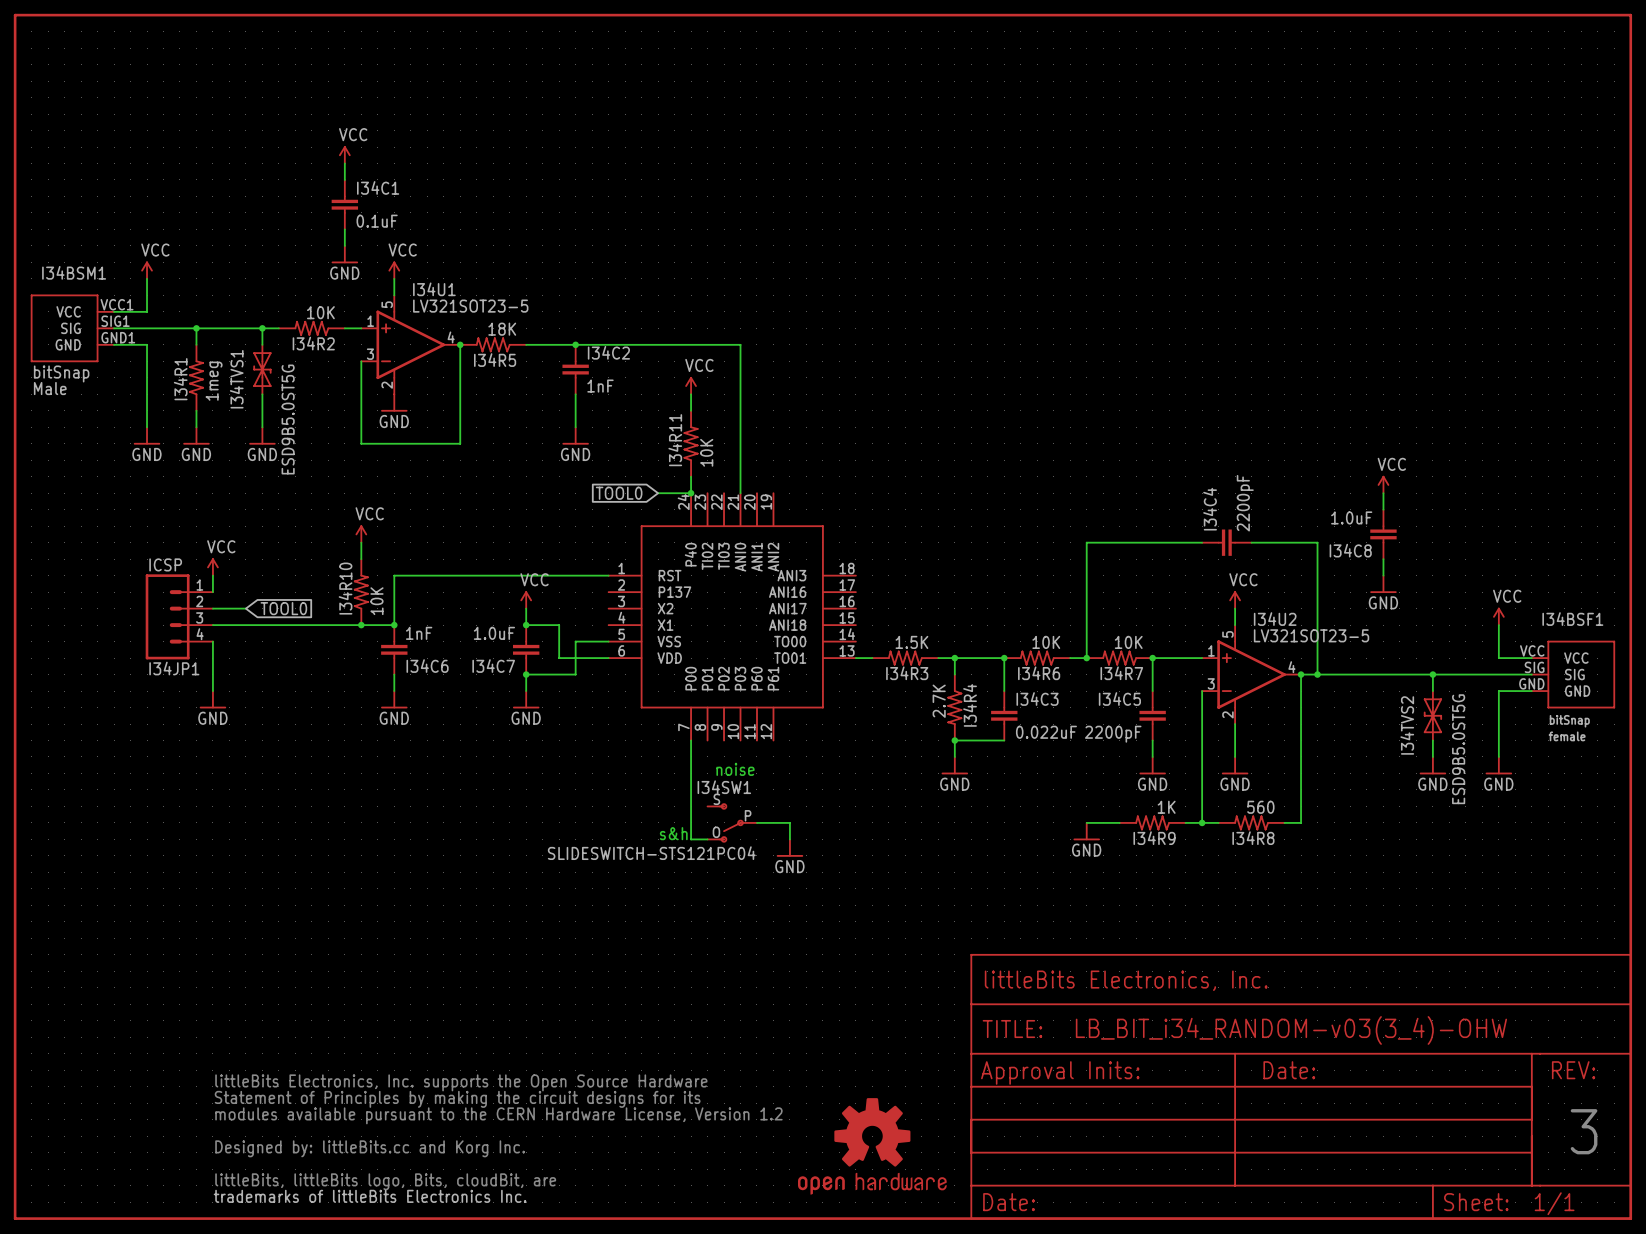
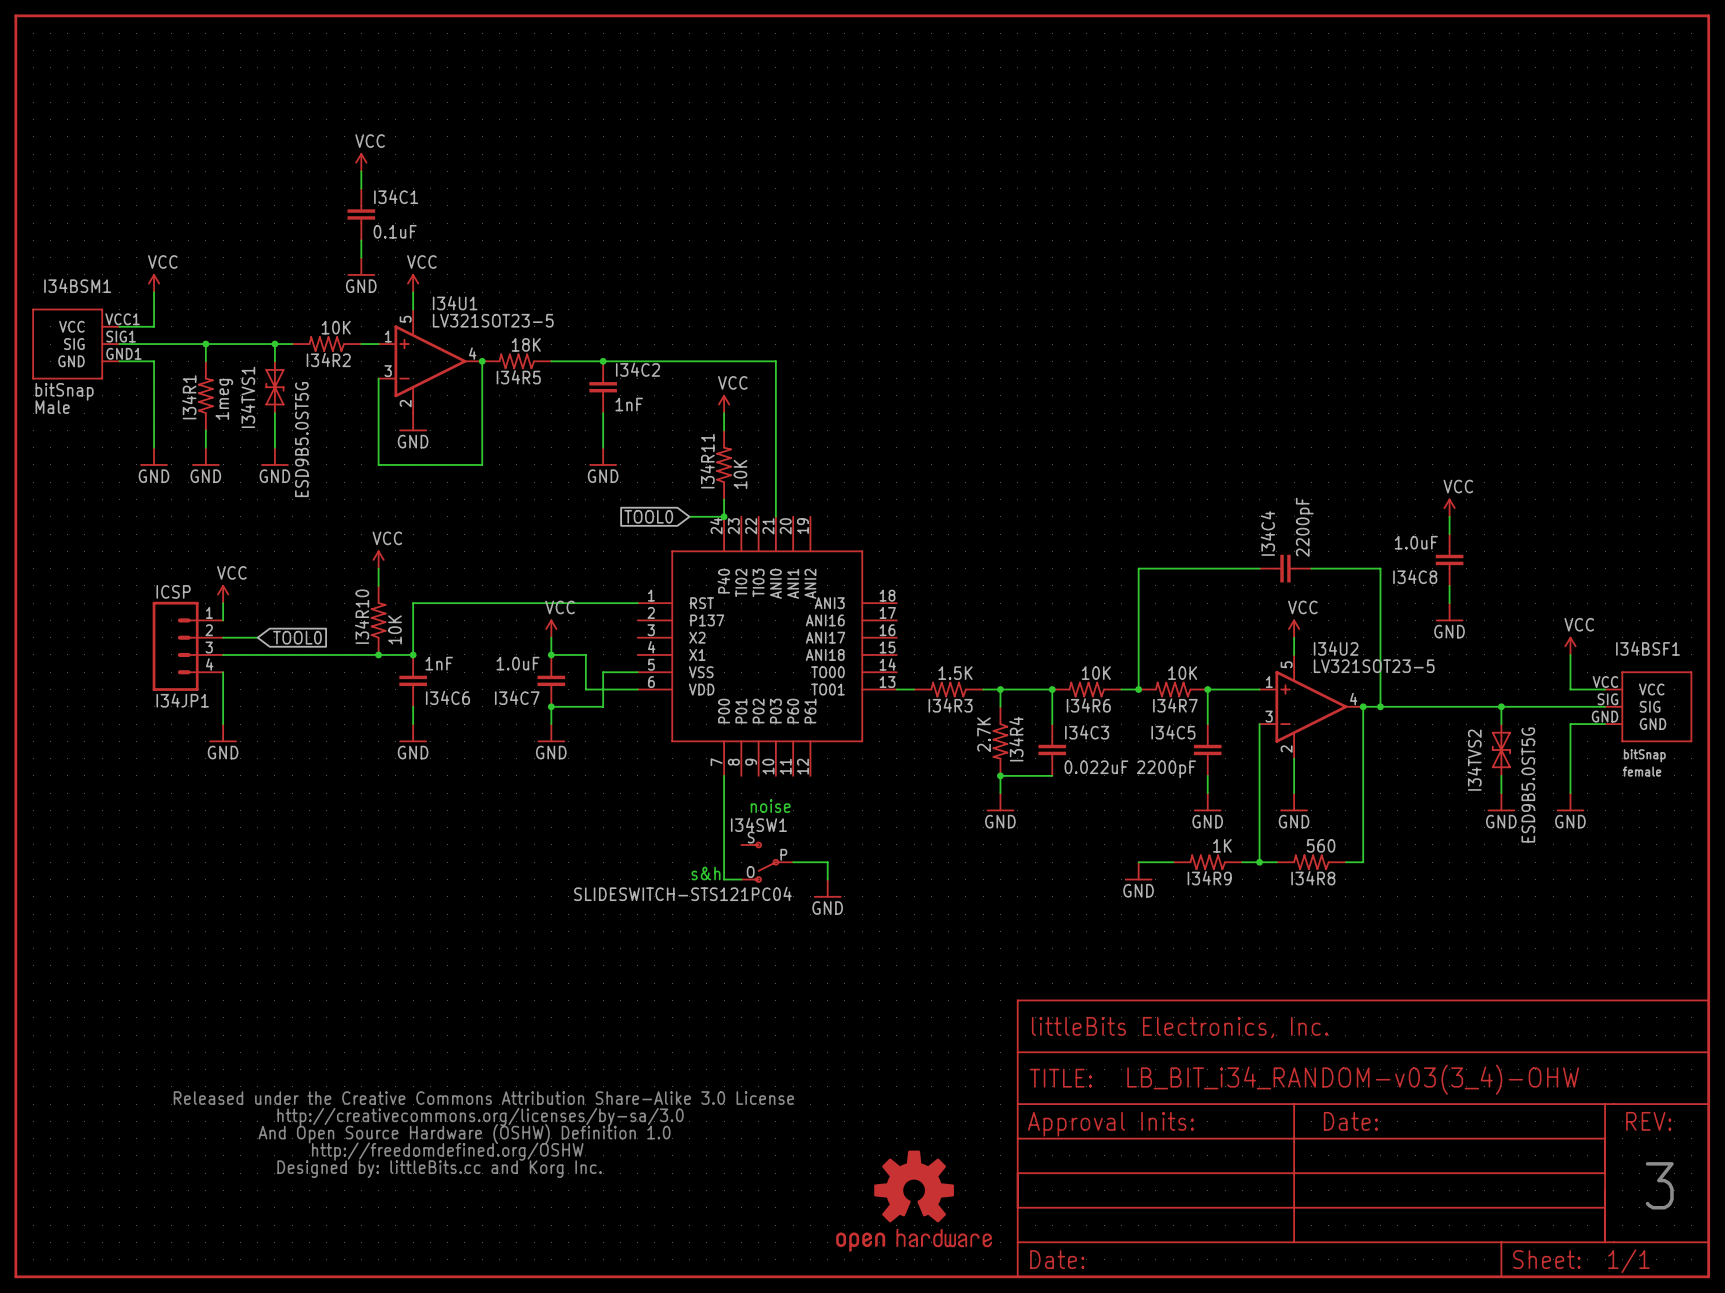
part: none -> (483, 1134)
part: (498, 1138) -> none

